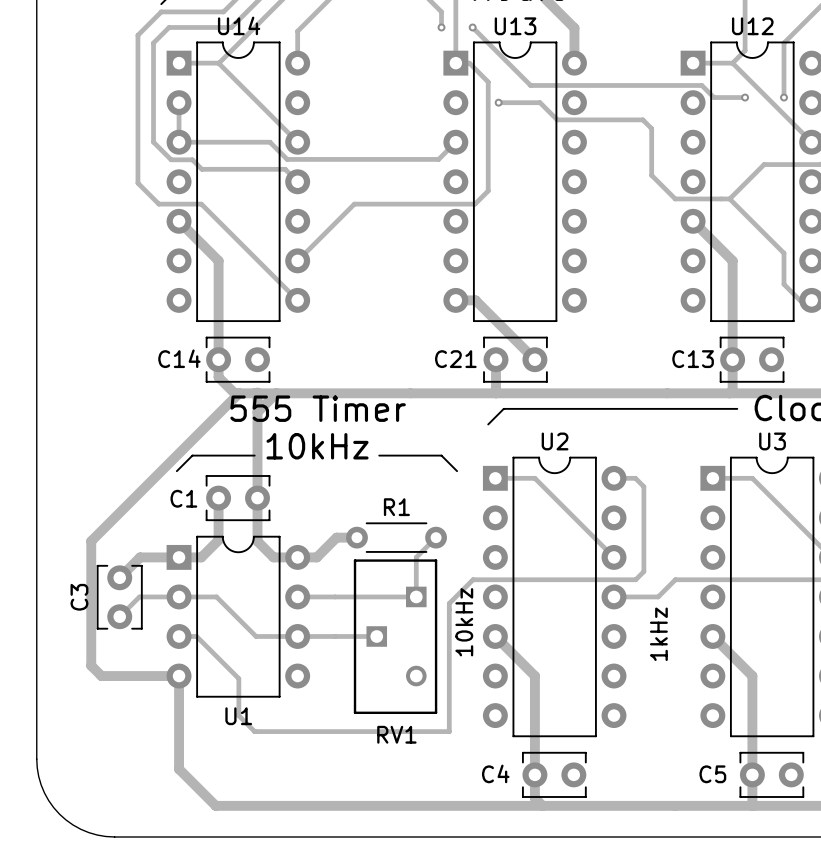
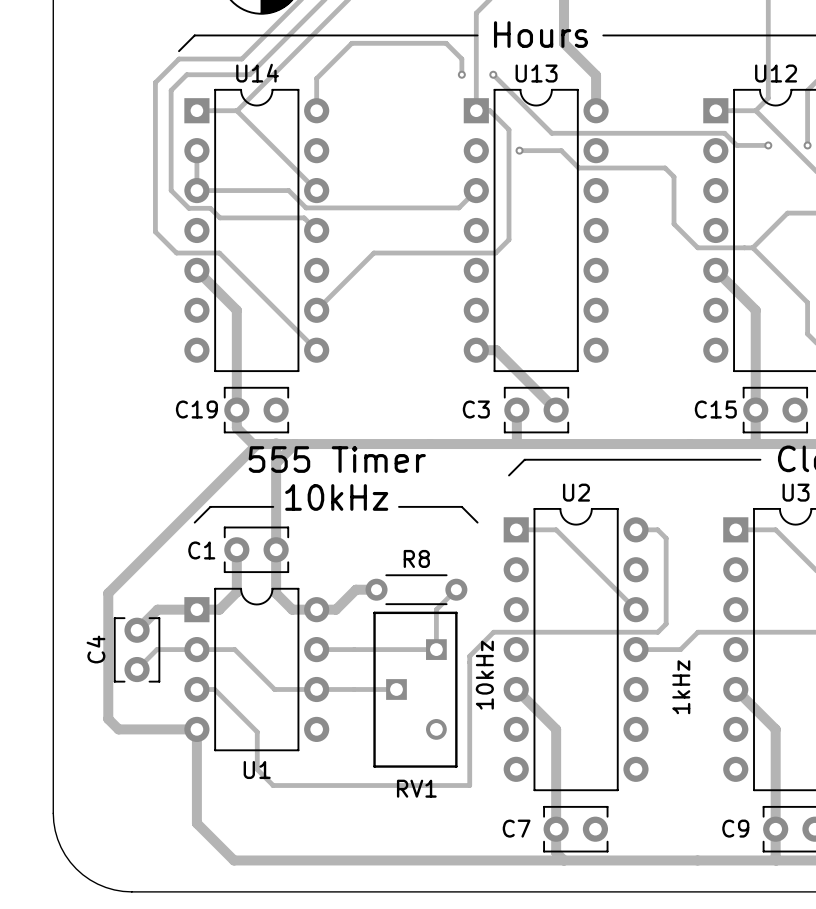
C14 name: C14 (179, 358) -> C19 (196, 409)
C21 name: C21 (455, 359) -> C3 (476, 409)
C13 name: C13 (693, 359) -> C15 (715, 409)
R1 name: R1 (396, 507) -> R8 (416, 558)
C3 name: C3 (79, 597) -> C4 (96, 649)
C4 name: C4 (495, 773) -> C7 (516, 828)
C5 name: C5 (712, 774) -> C9 (735, 828)

